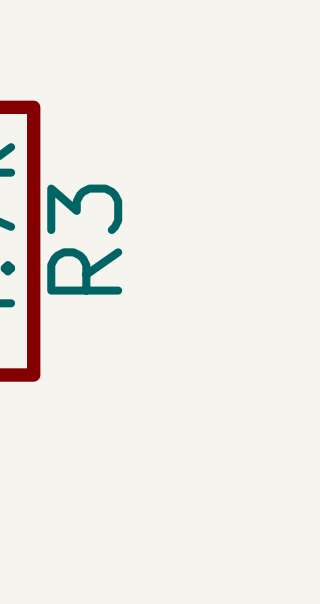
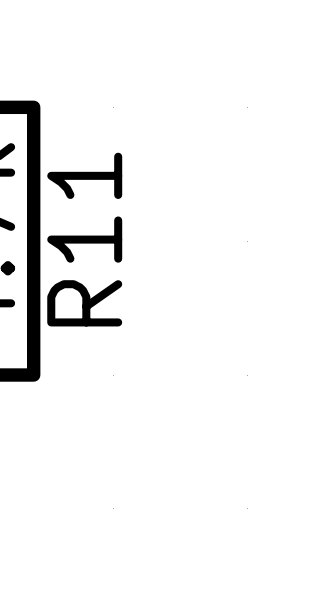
R3 name: R3 (84, 239) -> R11 (84, 239)

